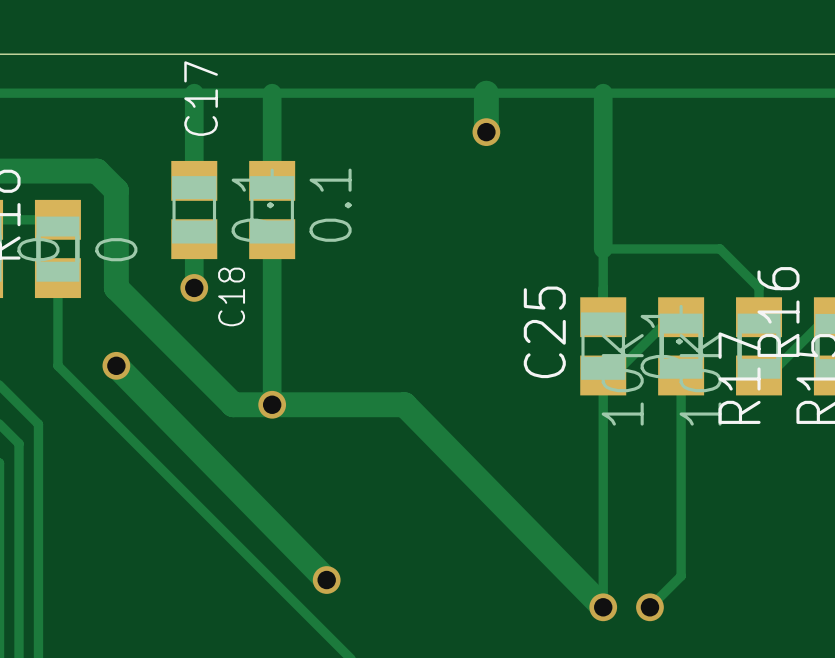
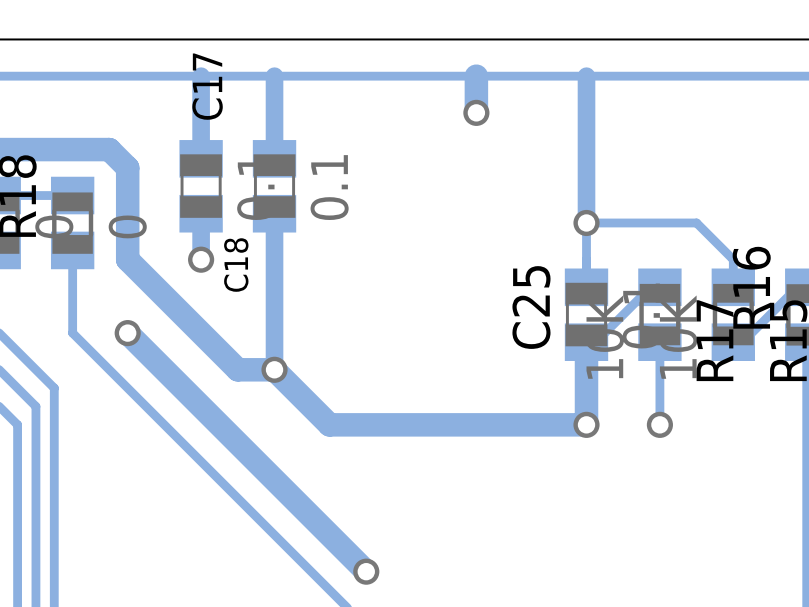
via: none -> (586, 222)
track: (116, 365) (326, 580) -> (127, 333) (366, 571)
track width: thin (603, 375) (603, 463) -> thick (586, 342) (586, 424)
track: (272, 404) (404, 404) (603, 607) (603, 463) -> (274, 369) (329, 424) (586, 424)
via: none -> (586, 424)
track: (681, 463) (681, 576) (649, 607) -> none
via: none -> (659, 424)
via: (326, 580) -> none
via: (603, 607) -> none
via: (649, 607) -> none
via: none -> (366, 571)

